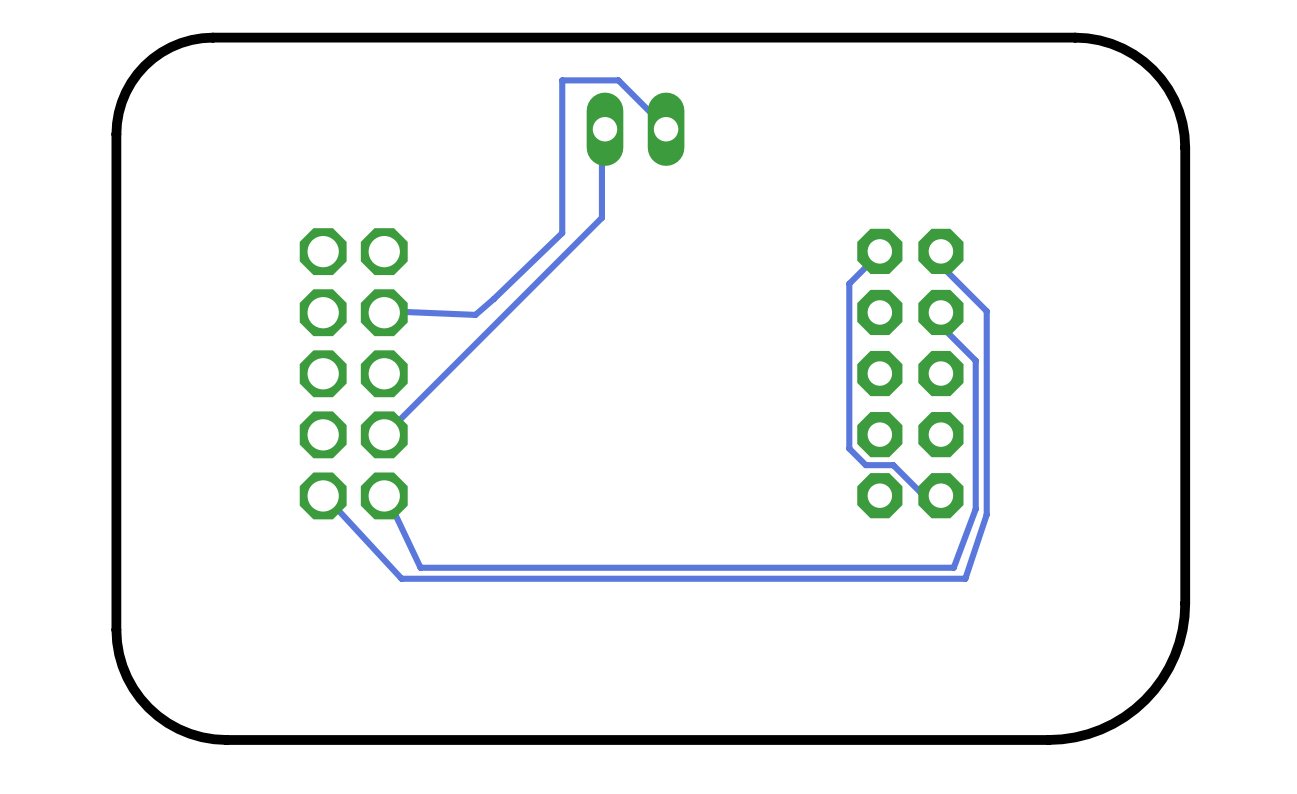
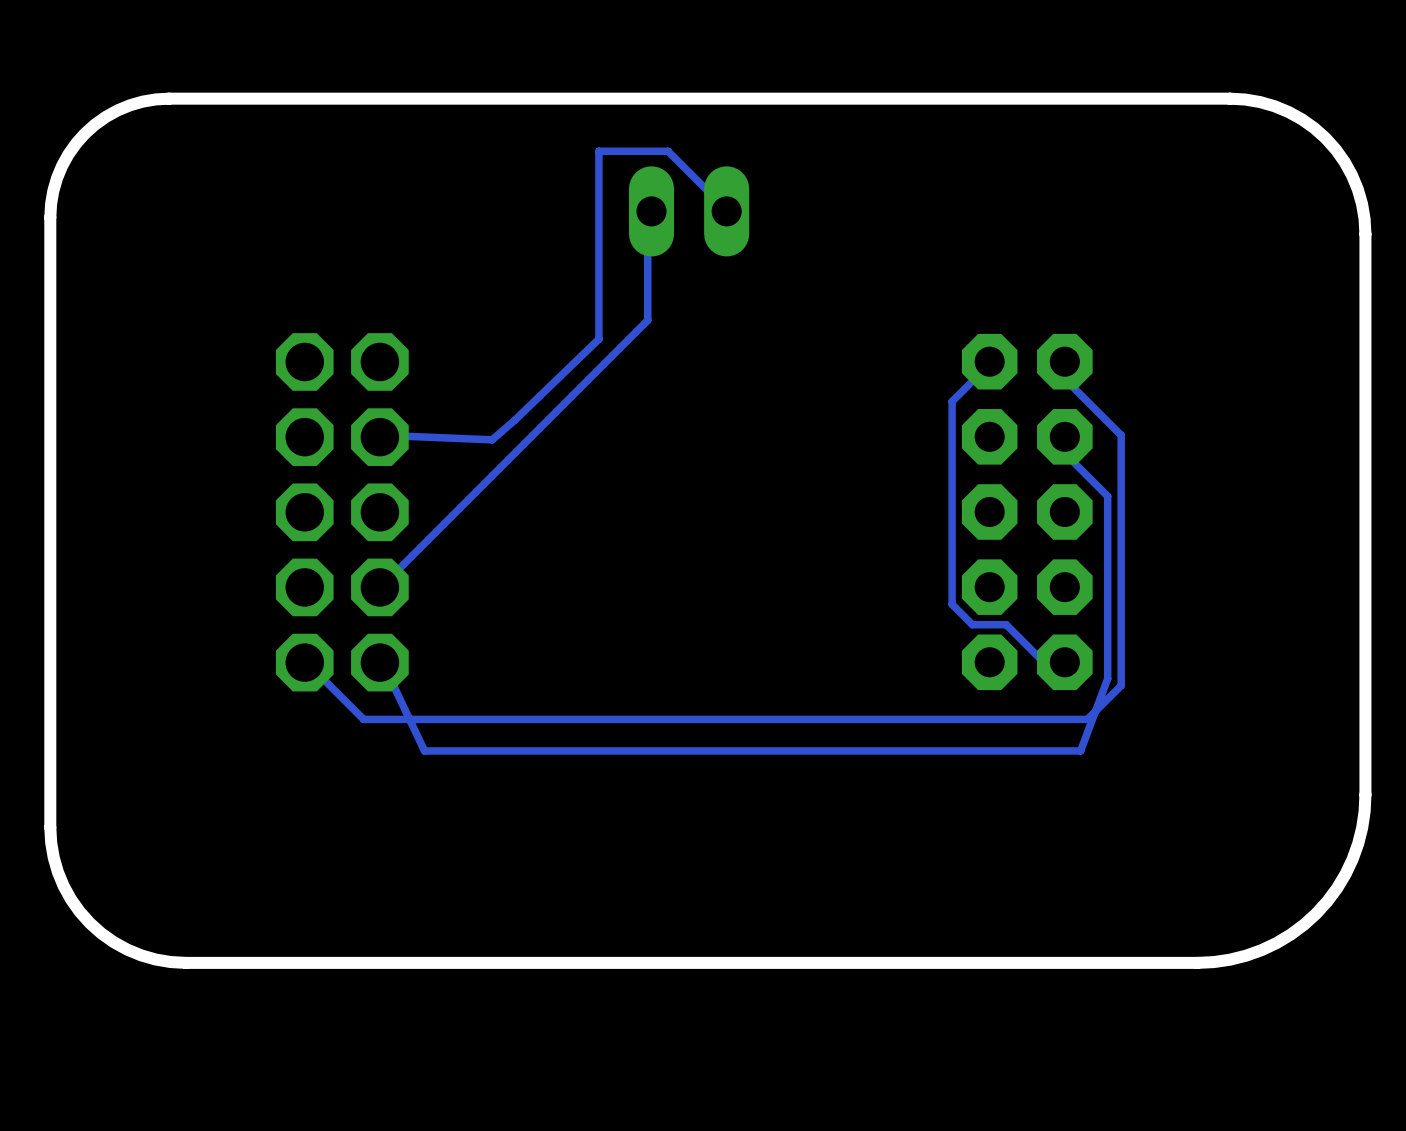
track: (327, 498) (401, 578) (965, 578) (986, 514) -> (309, 665) (363, 719) (1087, 719) (1121, 685)

